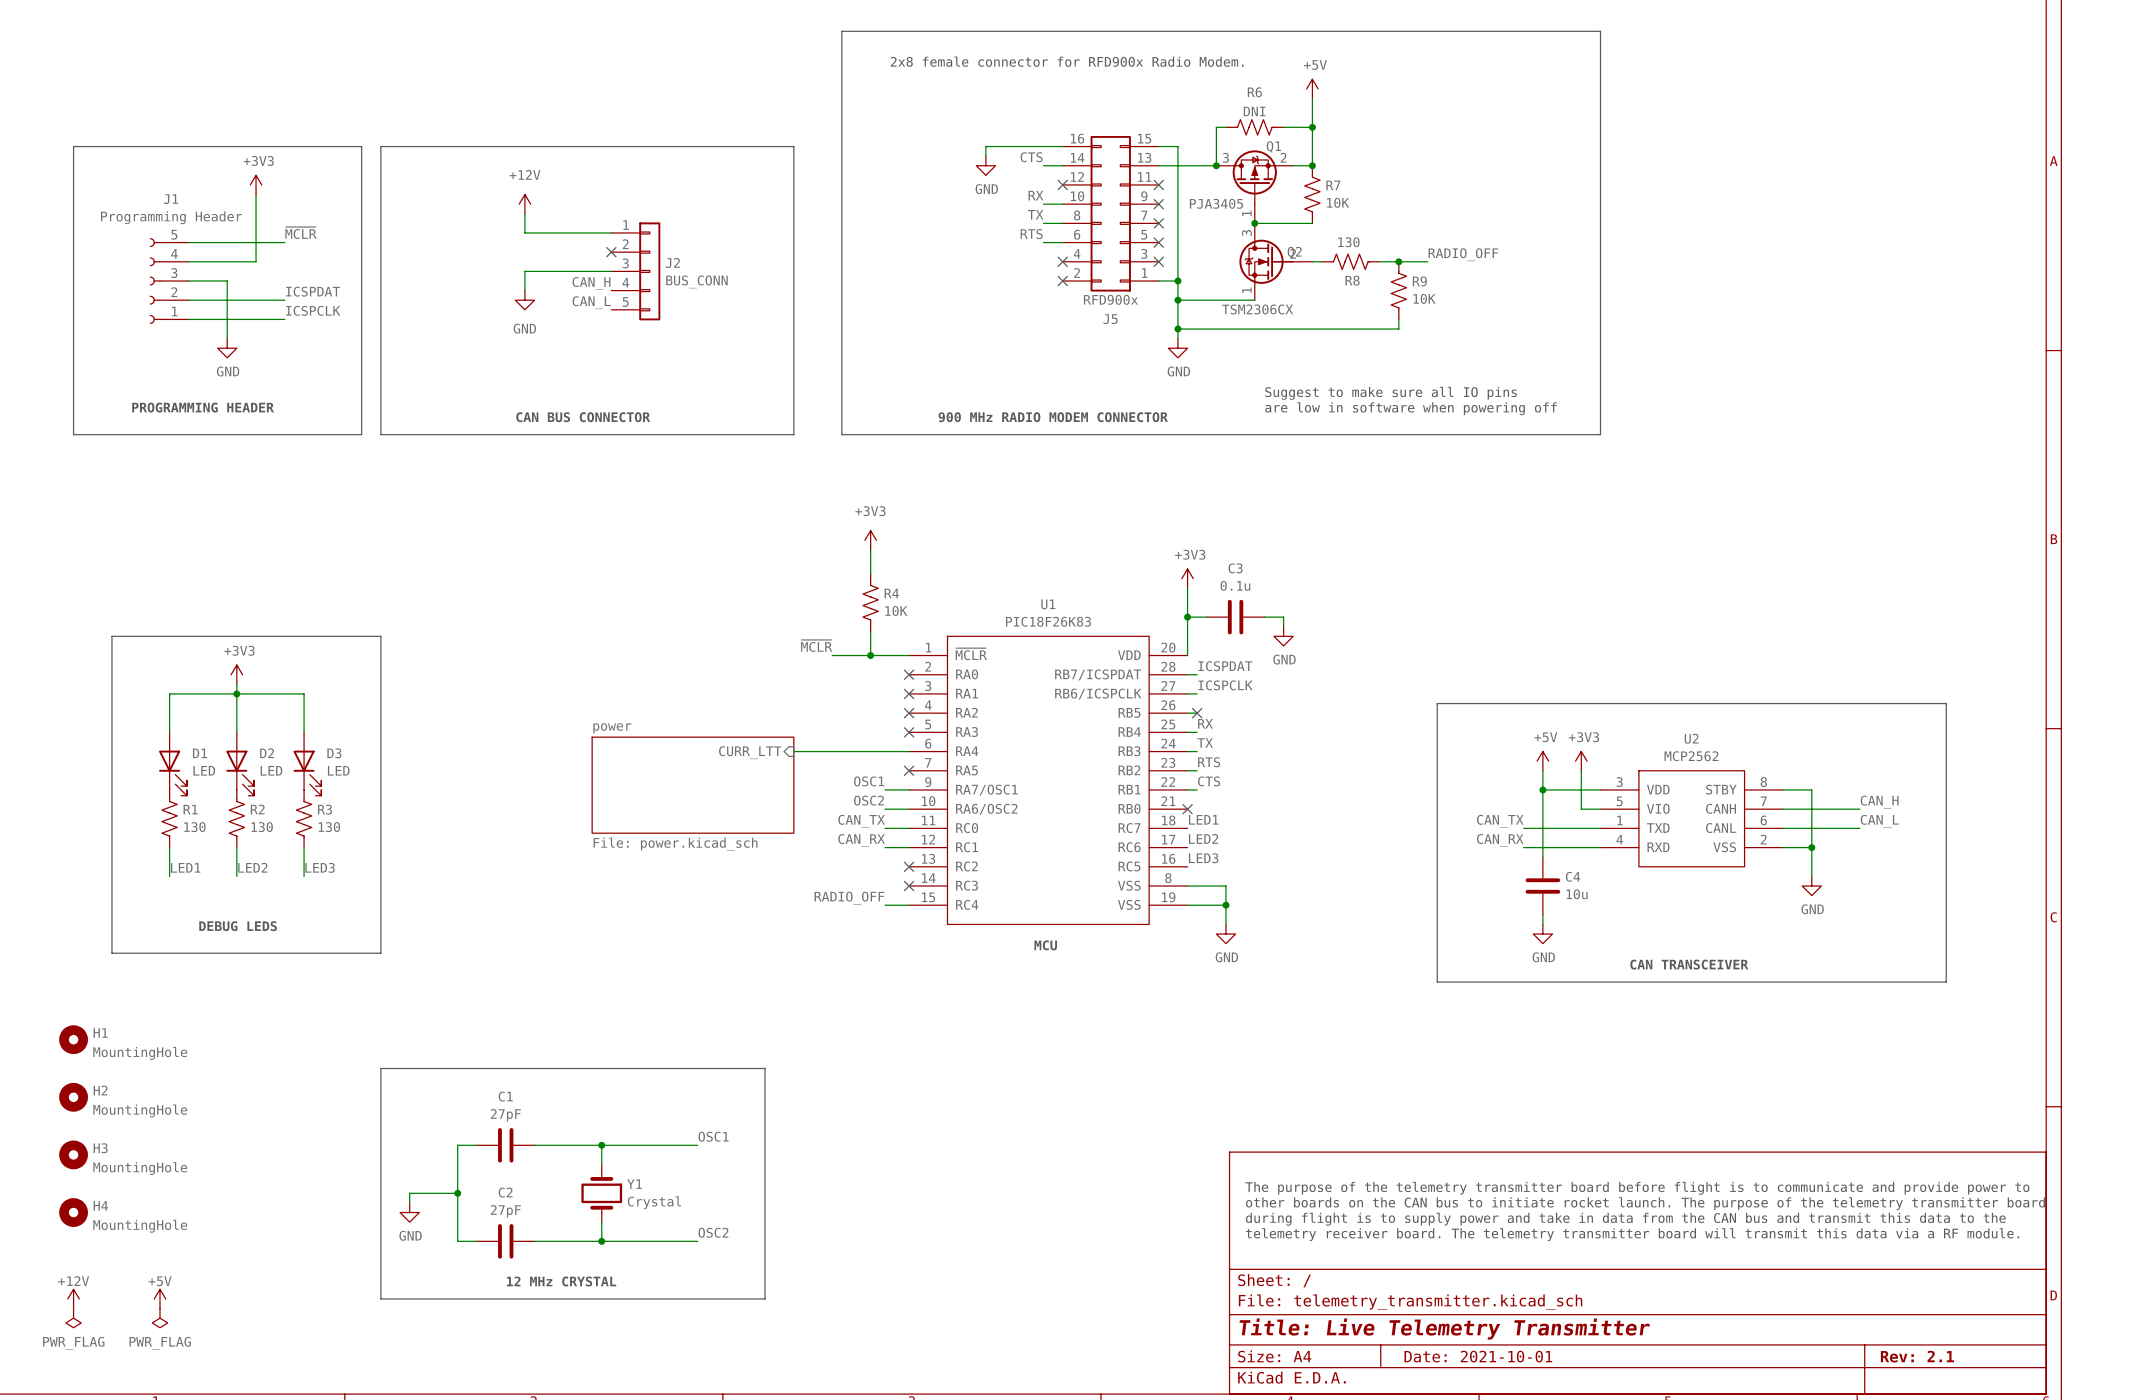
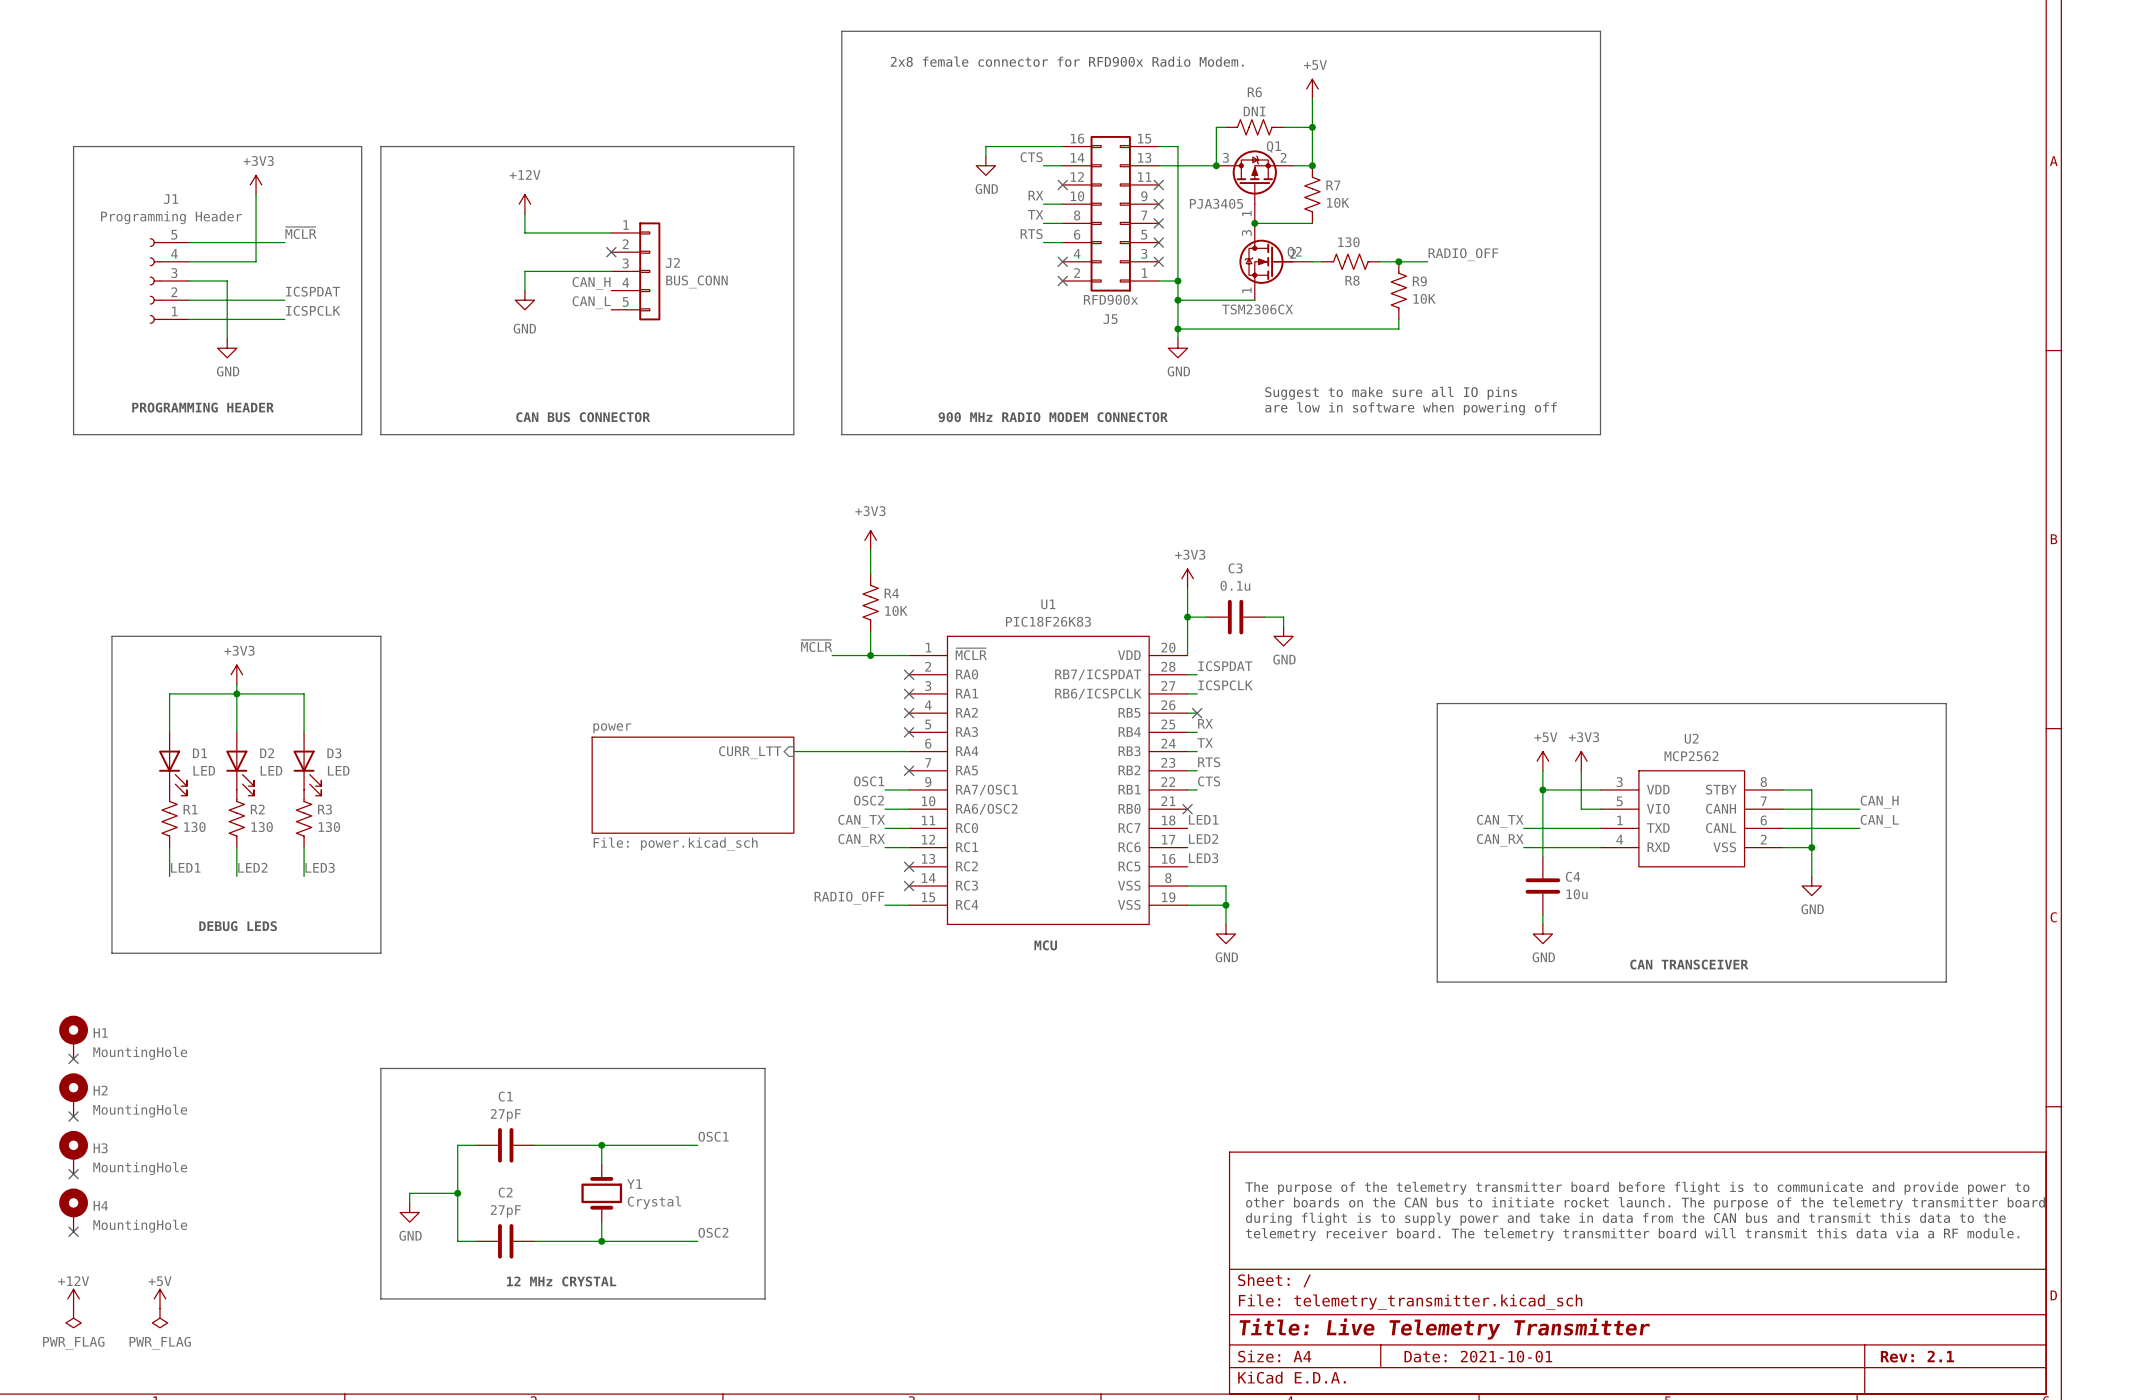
H1 symbol: [59, 1025, 88, 1055] -> [59, 1015, 88, 1059]
no-connect mark: none -> (73, 1058)
H2 symbol: [59, 1082, 88, 1112] -> [59, 1073, 88, 1117]
no-connect mark: none -> (73, 1116)
H3 symbol: [59, 1140, 88, 1170] -> [59, 1130, 88, 1175]
no-connect mark: none -> (73, 1174)
H4 symbol: [59, 1198, 88, 1227] -> [59, 1188, 88, 1232]
no-connect mark: none -> (73, 1231)

